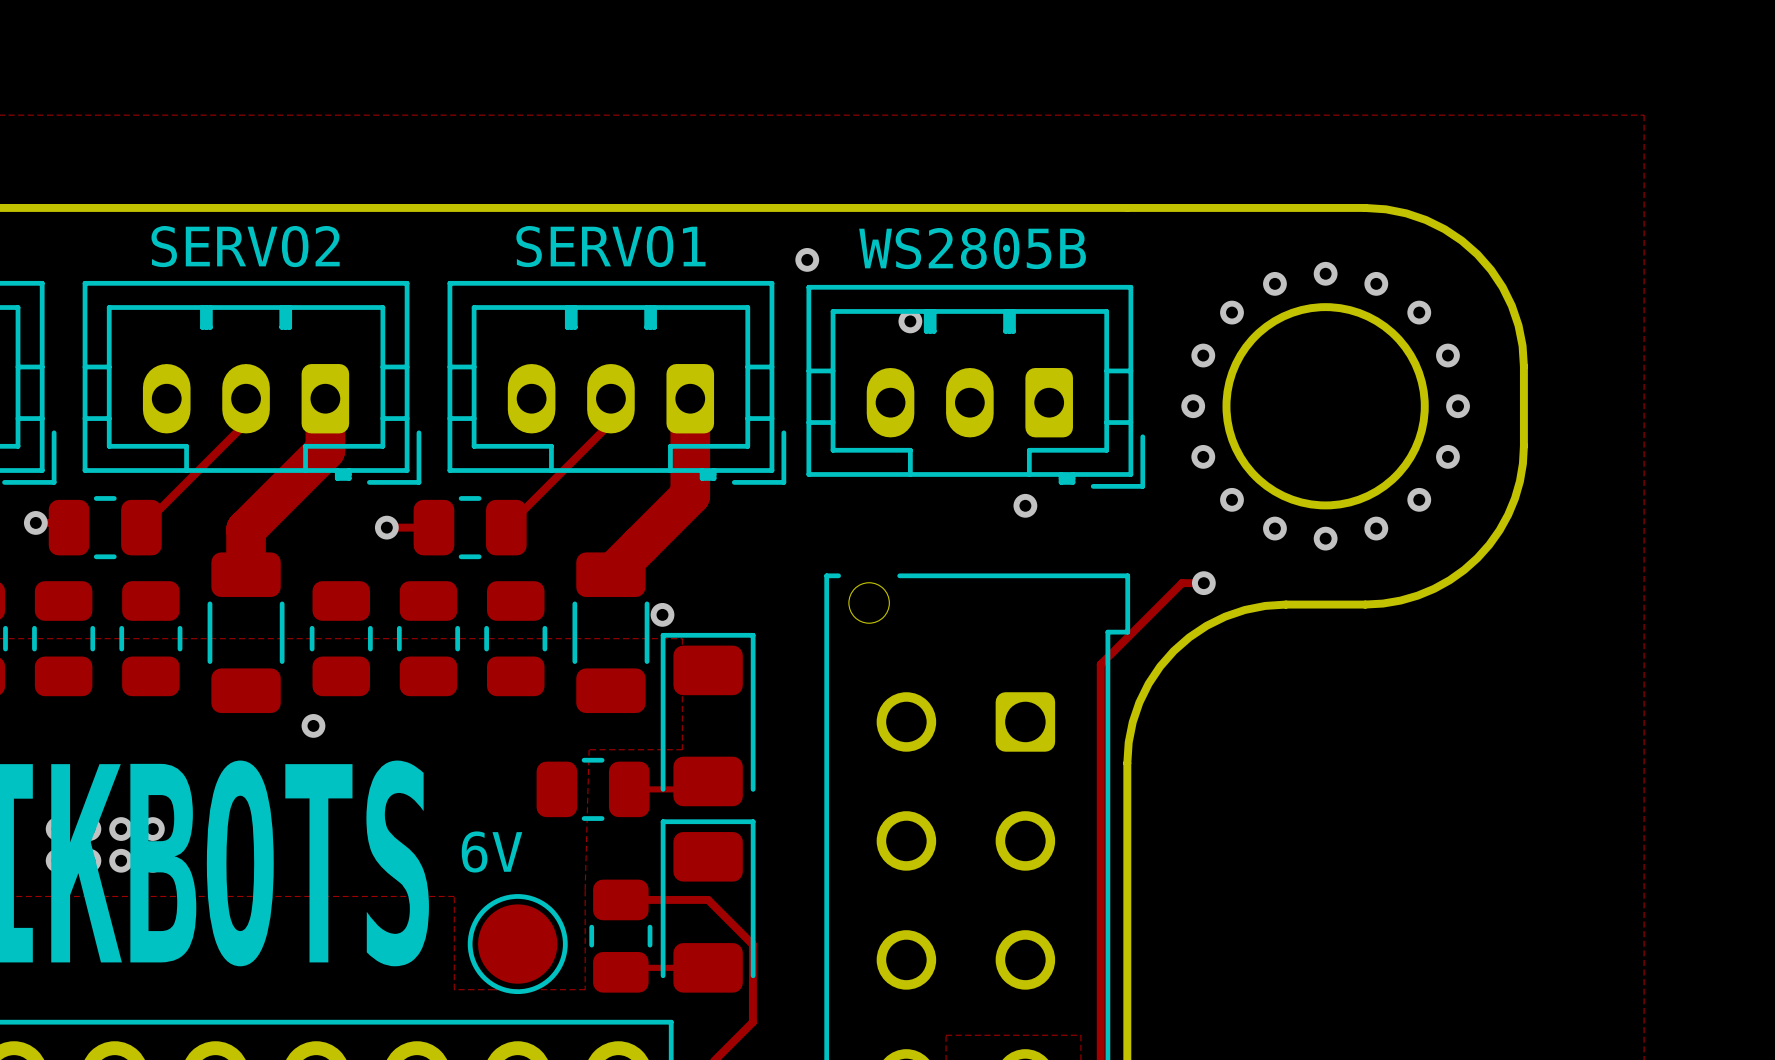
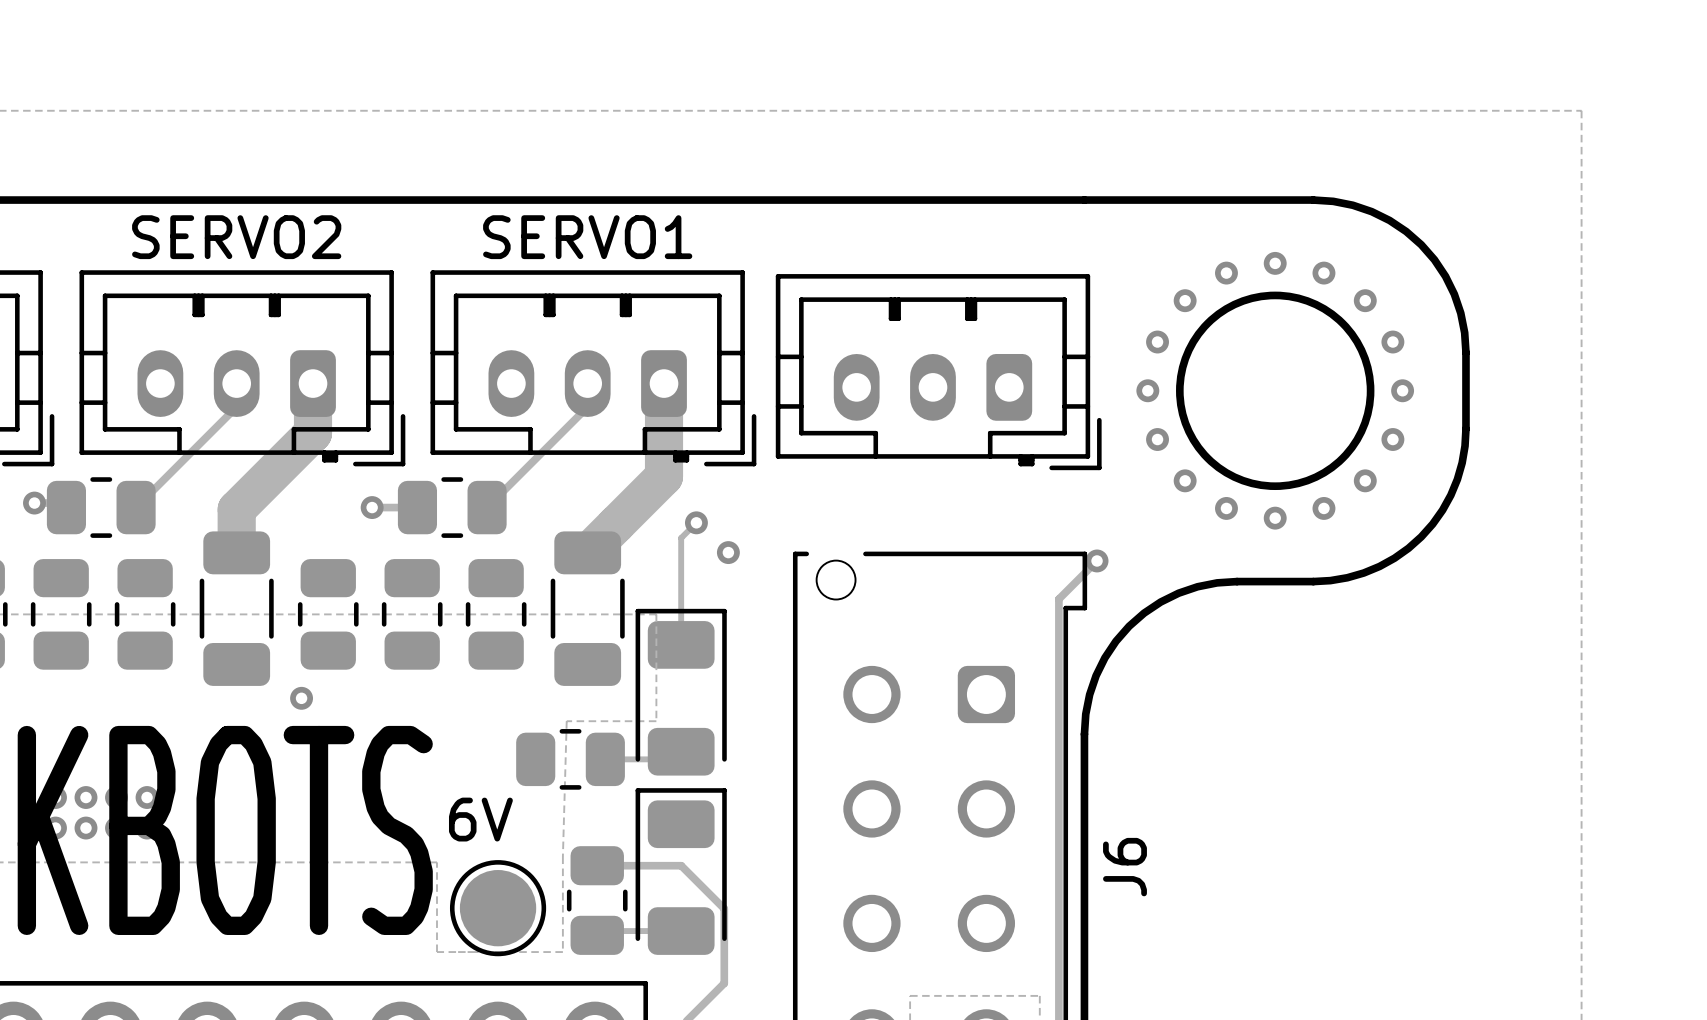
text: WS2805B (972, 248) -> none
via: (807, 259) -> none
via: (910, 321) -> none
via: (1025, 505) -> none
track: none -> (696, 522) (681, 538) (681, 648)
via: none -> (696, 522)
via: none -> (728, 552)
track: (1203, 583) (1182, 583) (1100, 664) -> (1097, 560) (1058, 599) (1058, 639)
via position: (1203, 583) -> (1097, 560)
via: (662, 614) -> none
J6 name: none -> J6 (1124, 867)

